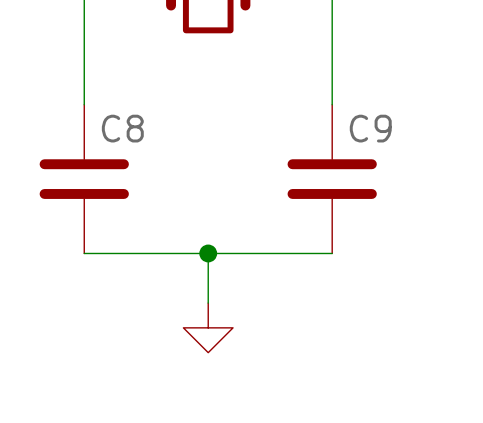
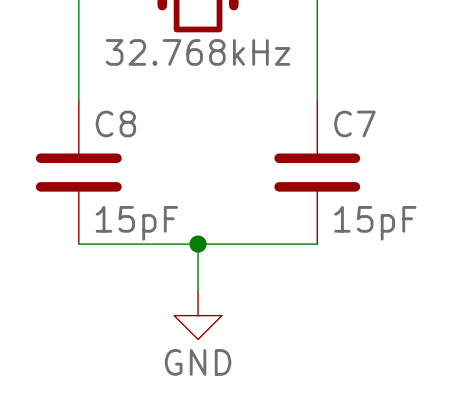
part value: none -> 32.768kHz (198, 52)
C9 name: C9 (370, 128) -> C7 (354, 123)
C8 value: none -> 15pF (136, 223)
C9 value: none -> 15pF (375, 223)
power symbol text: none -> GND (198, 362)

